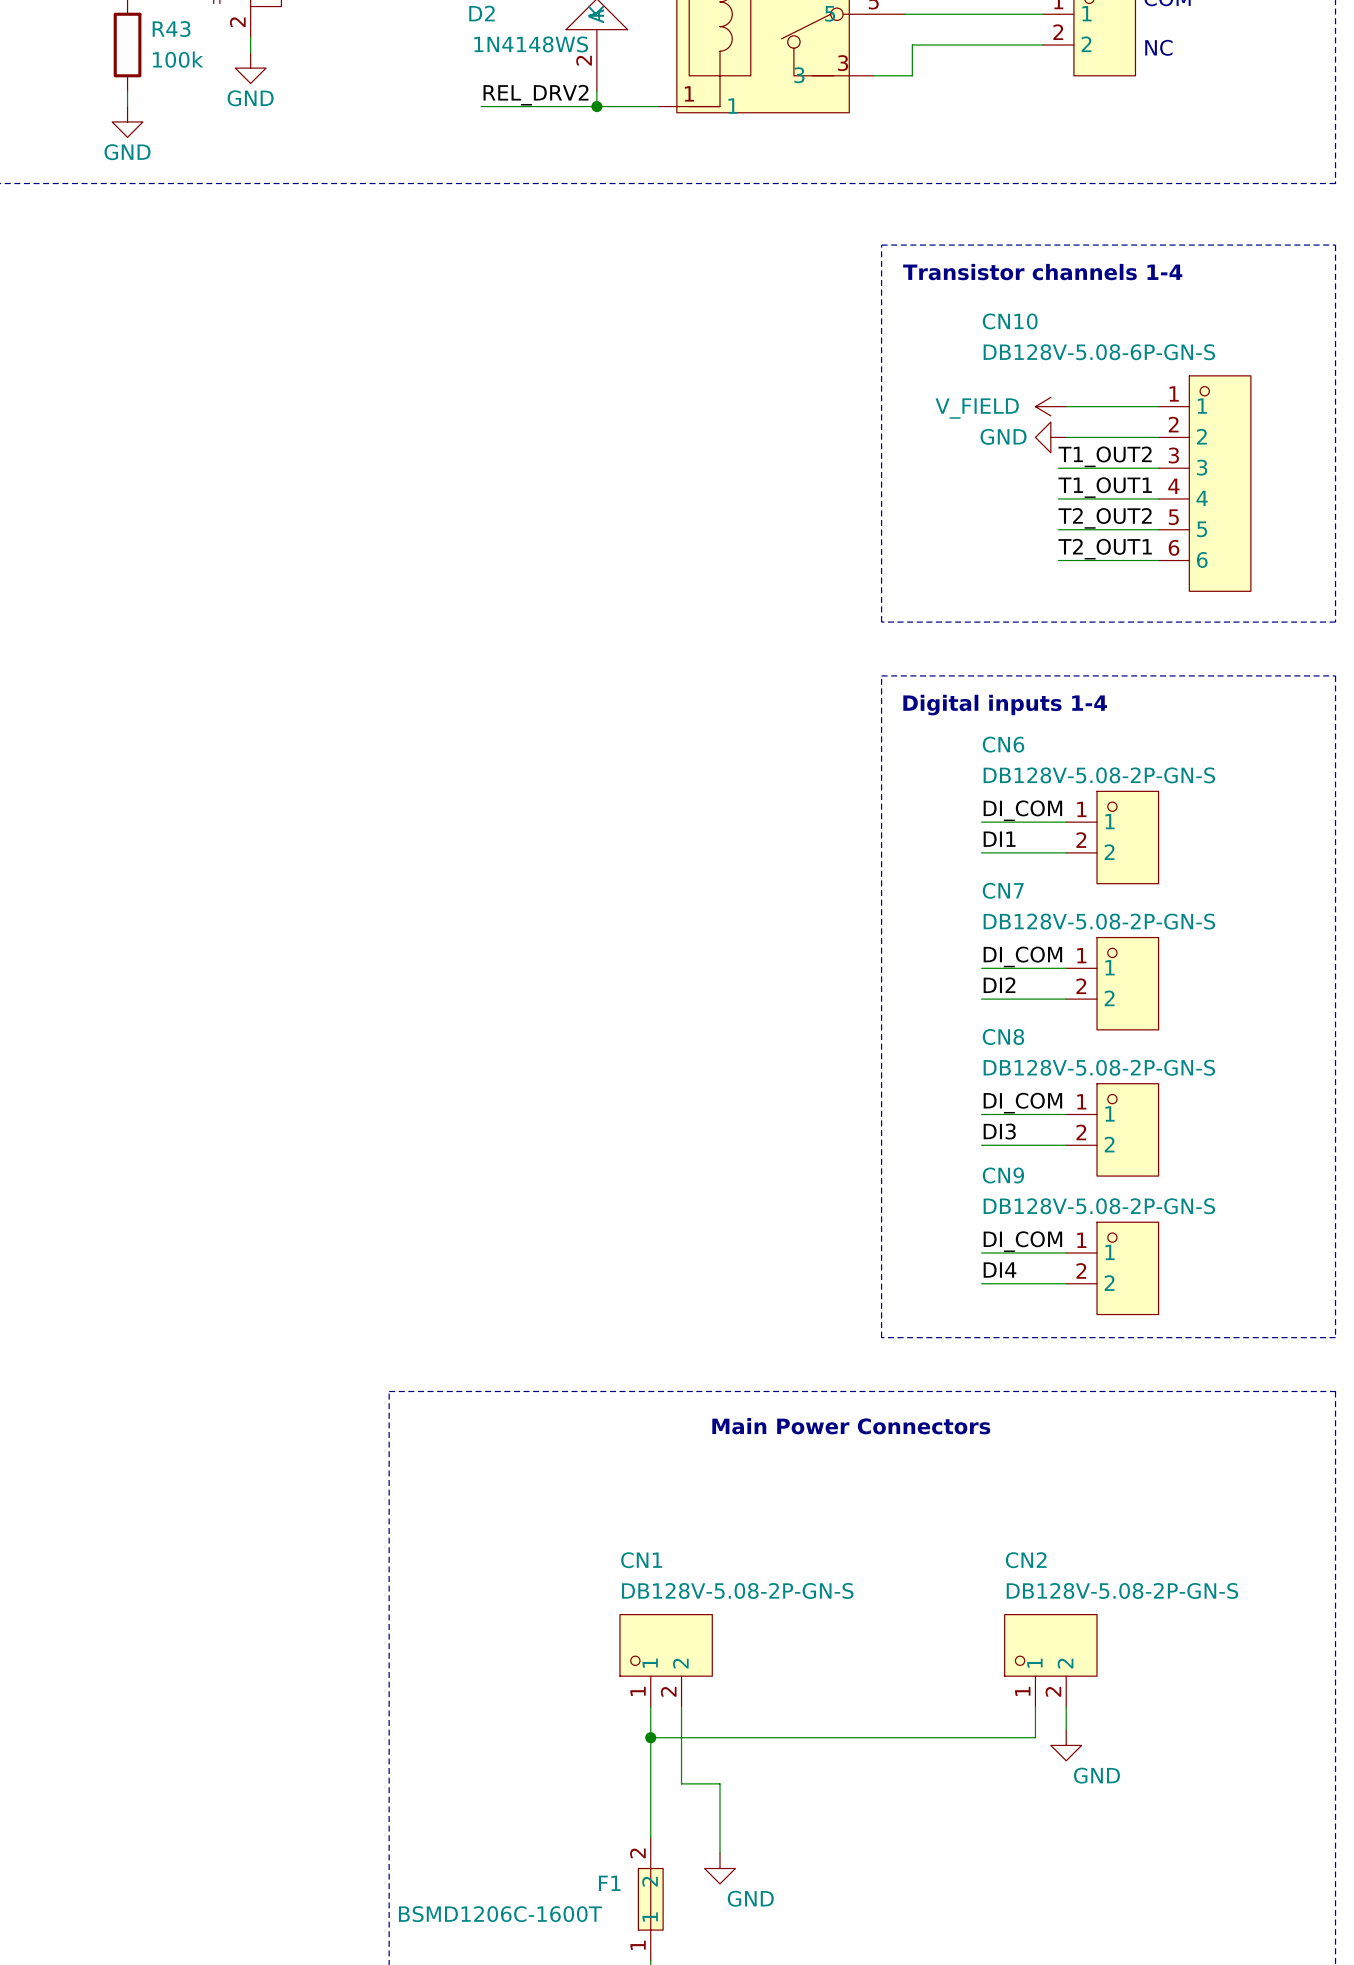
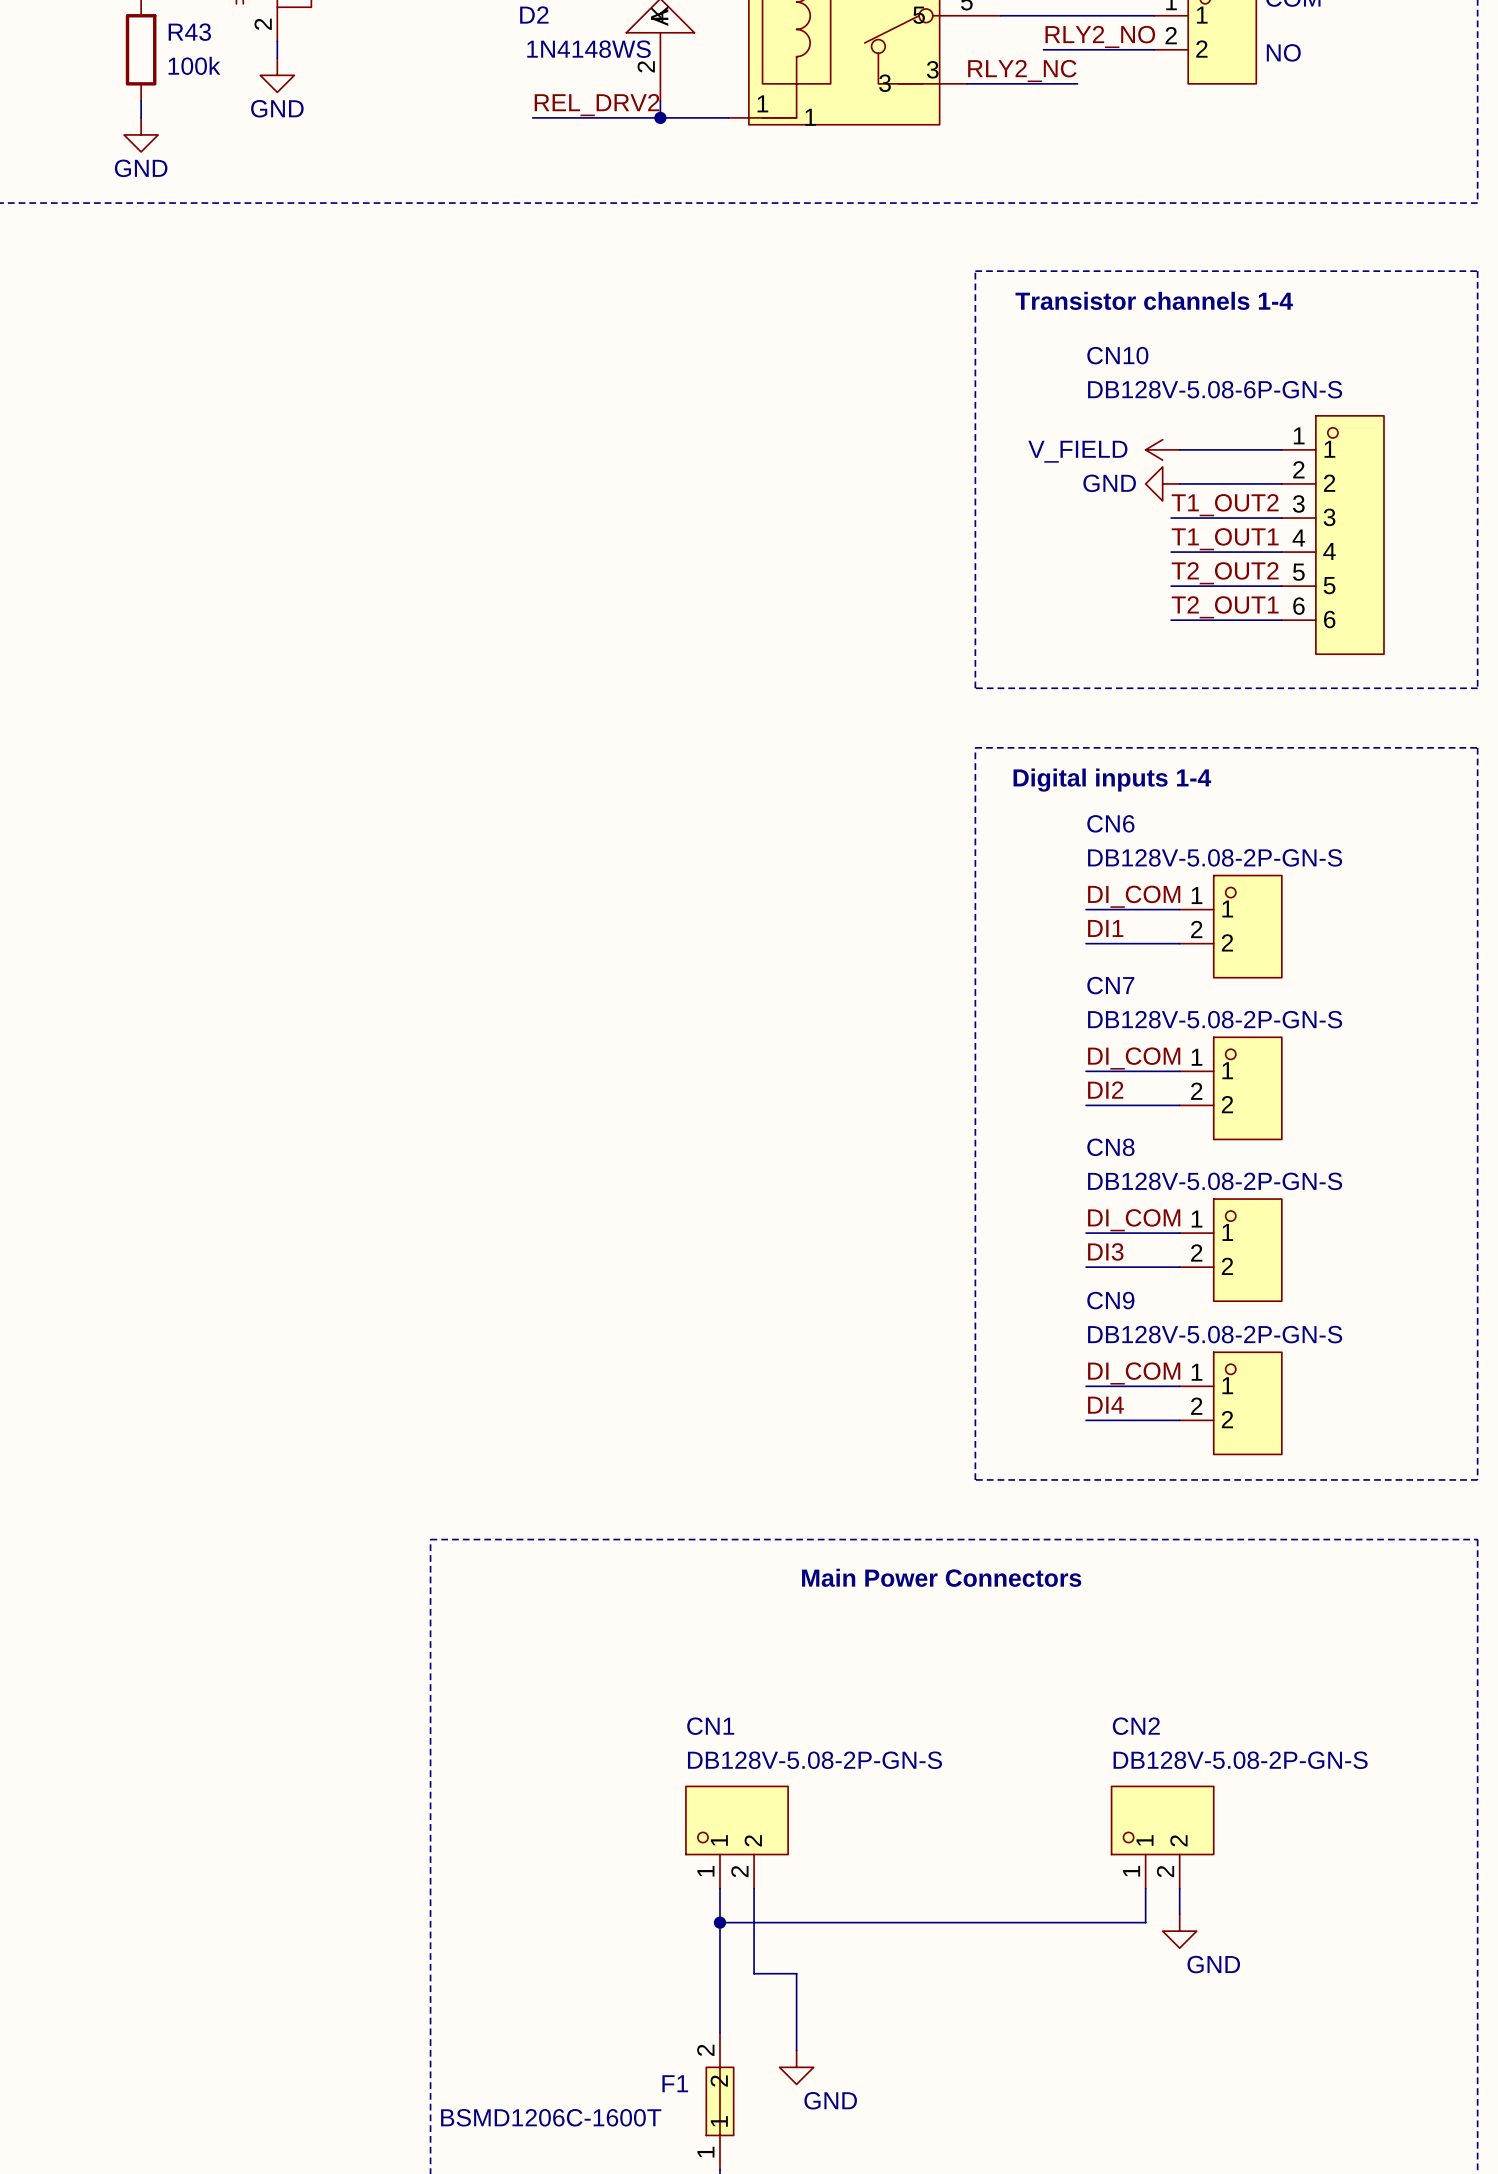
label: none -> RLY2_NO (1100, 36)
wire: (943, 45) (912, 45) (912, 75) -> (1077, 83) (1009, 83)
text: NC (1158, 47) -> NO (1283, 52)
label: none -> RLY2_NC (1022, 71)

